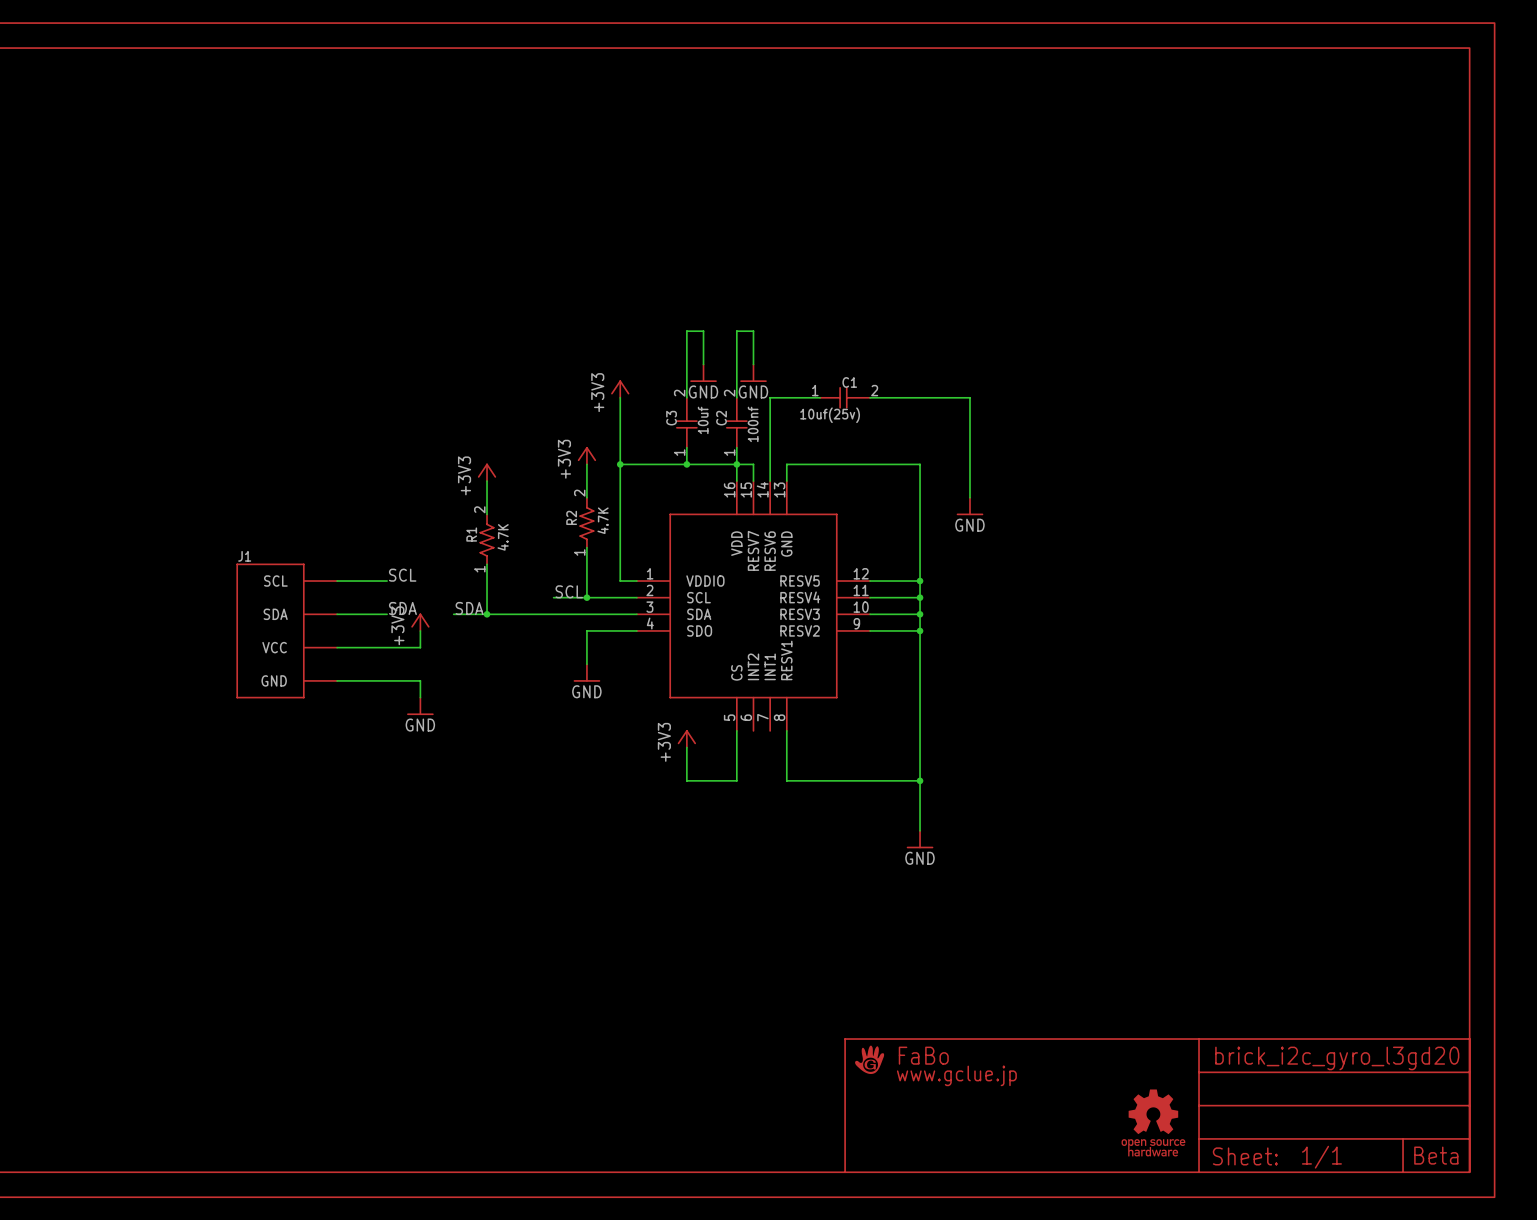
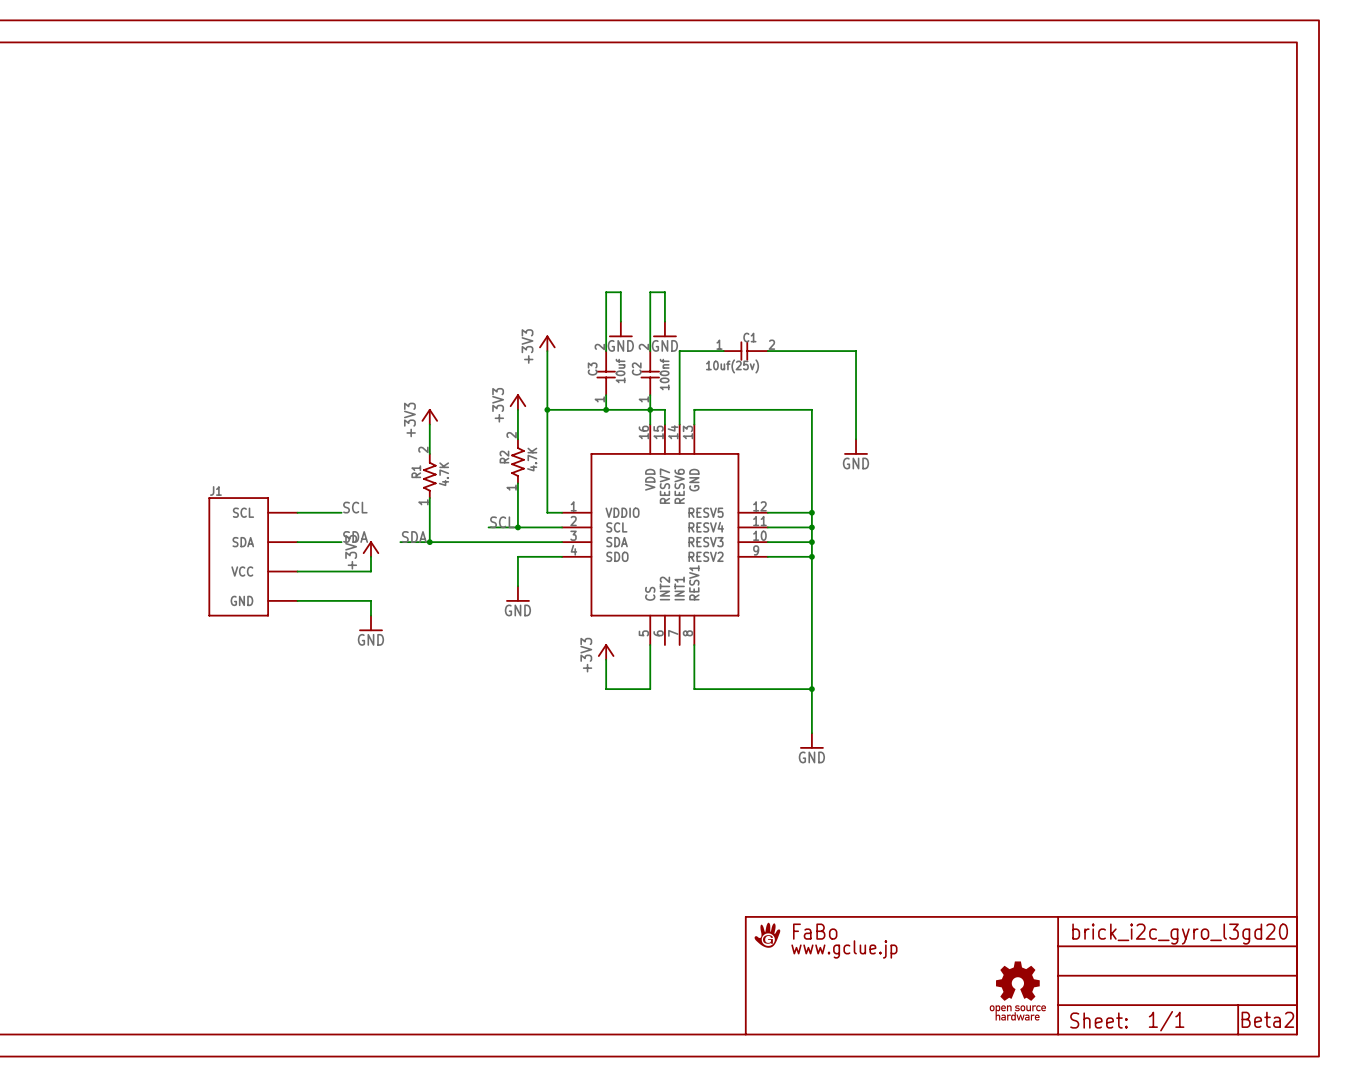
text: Beta (1436, 1155) -> Beta2 (1267, 1019)

